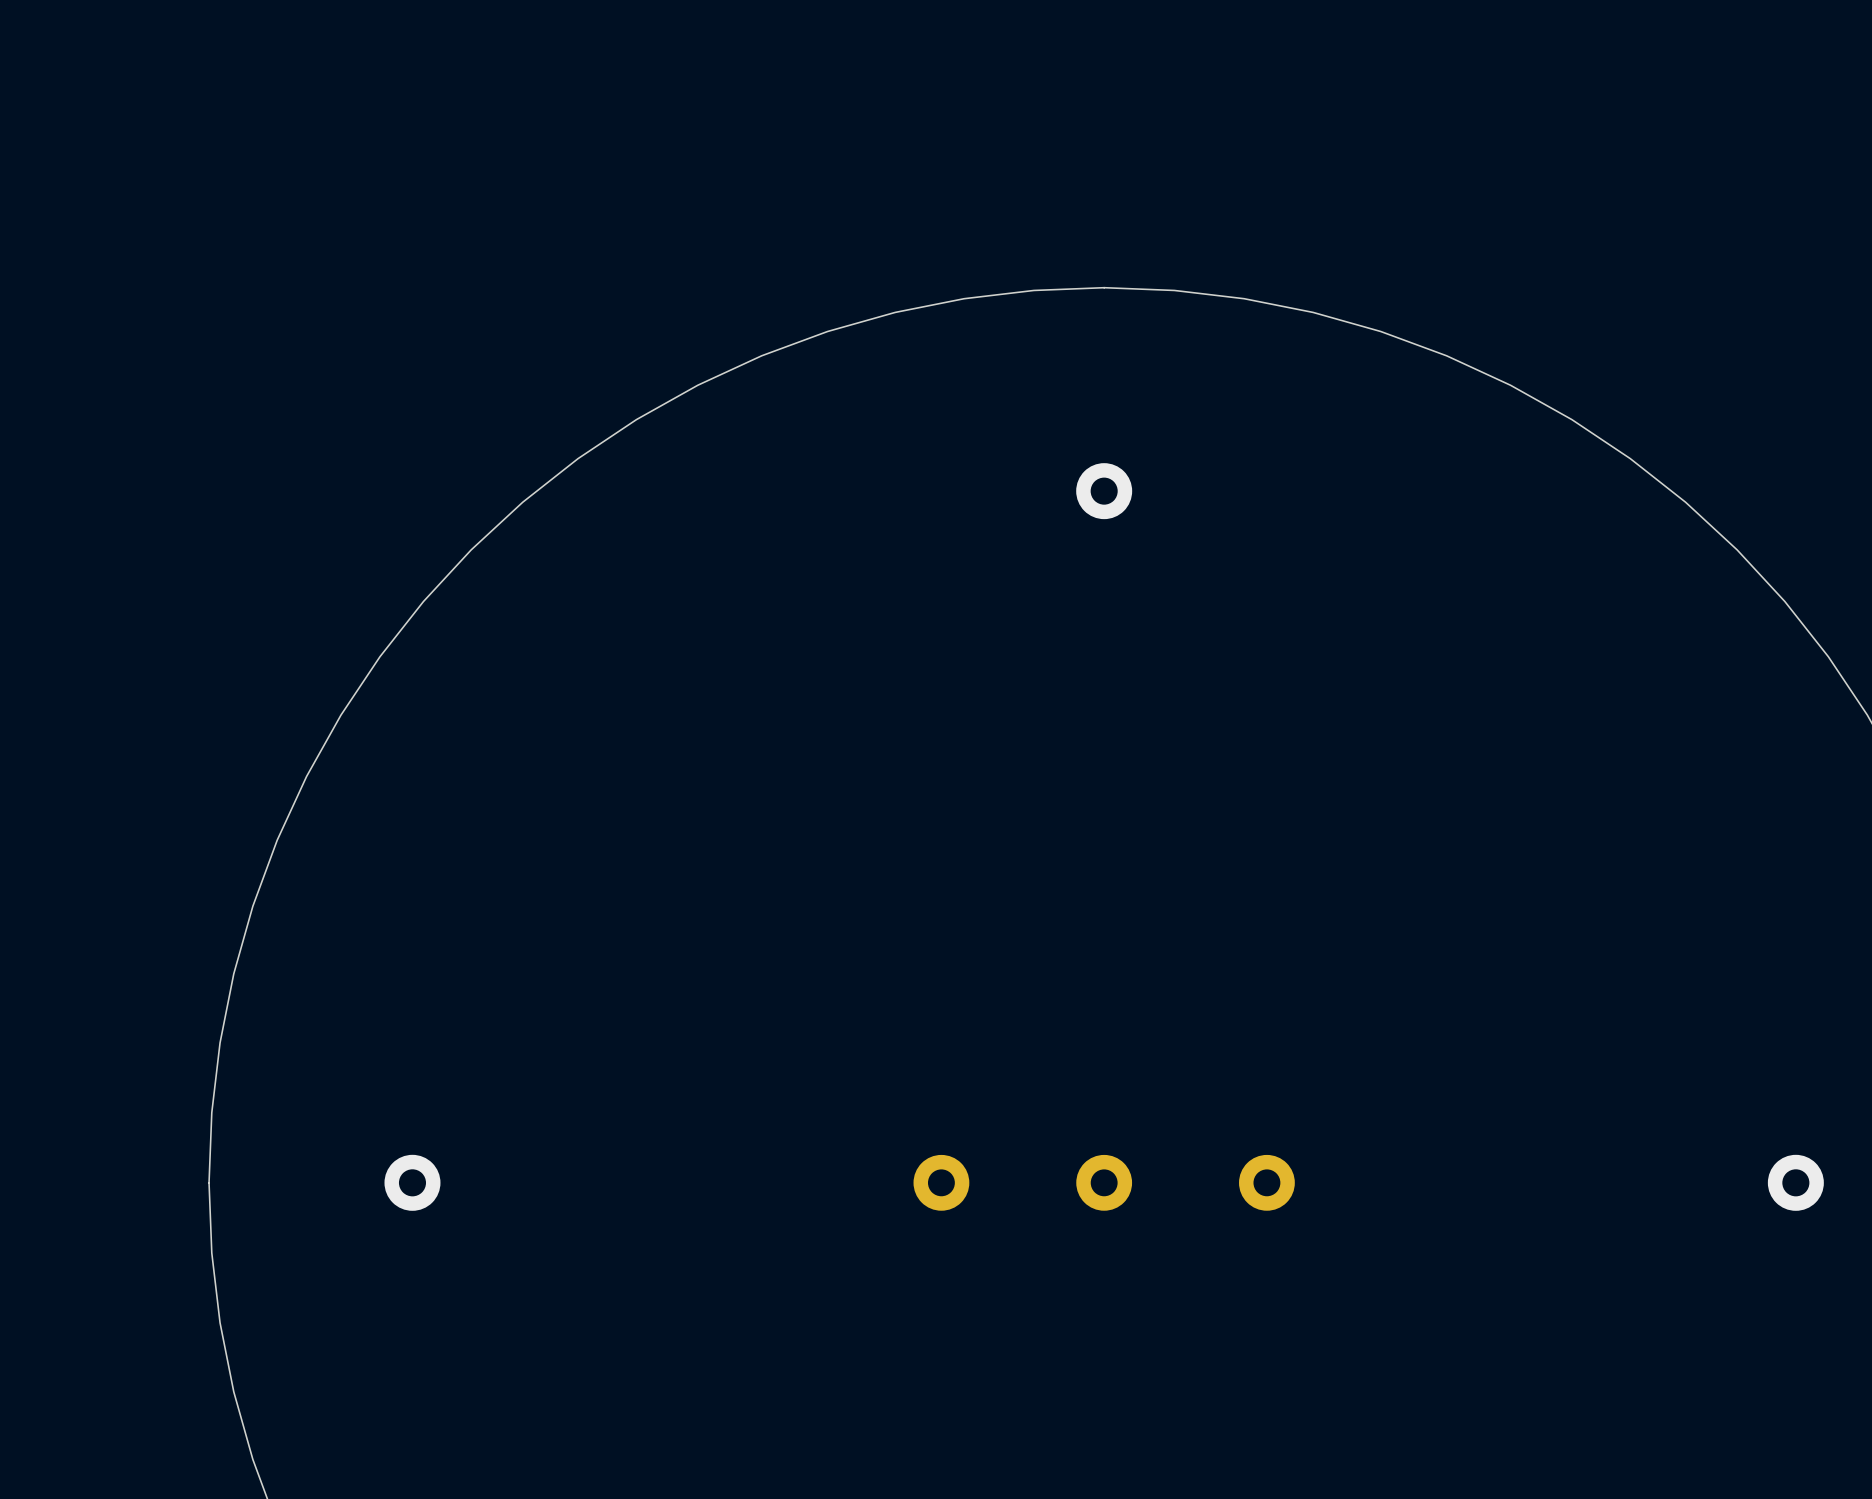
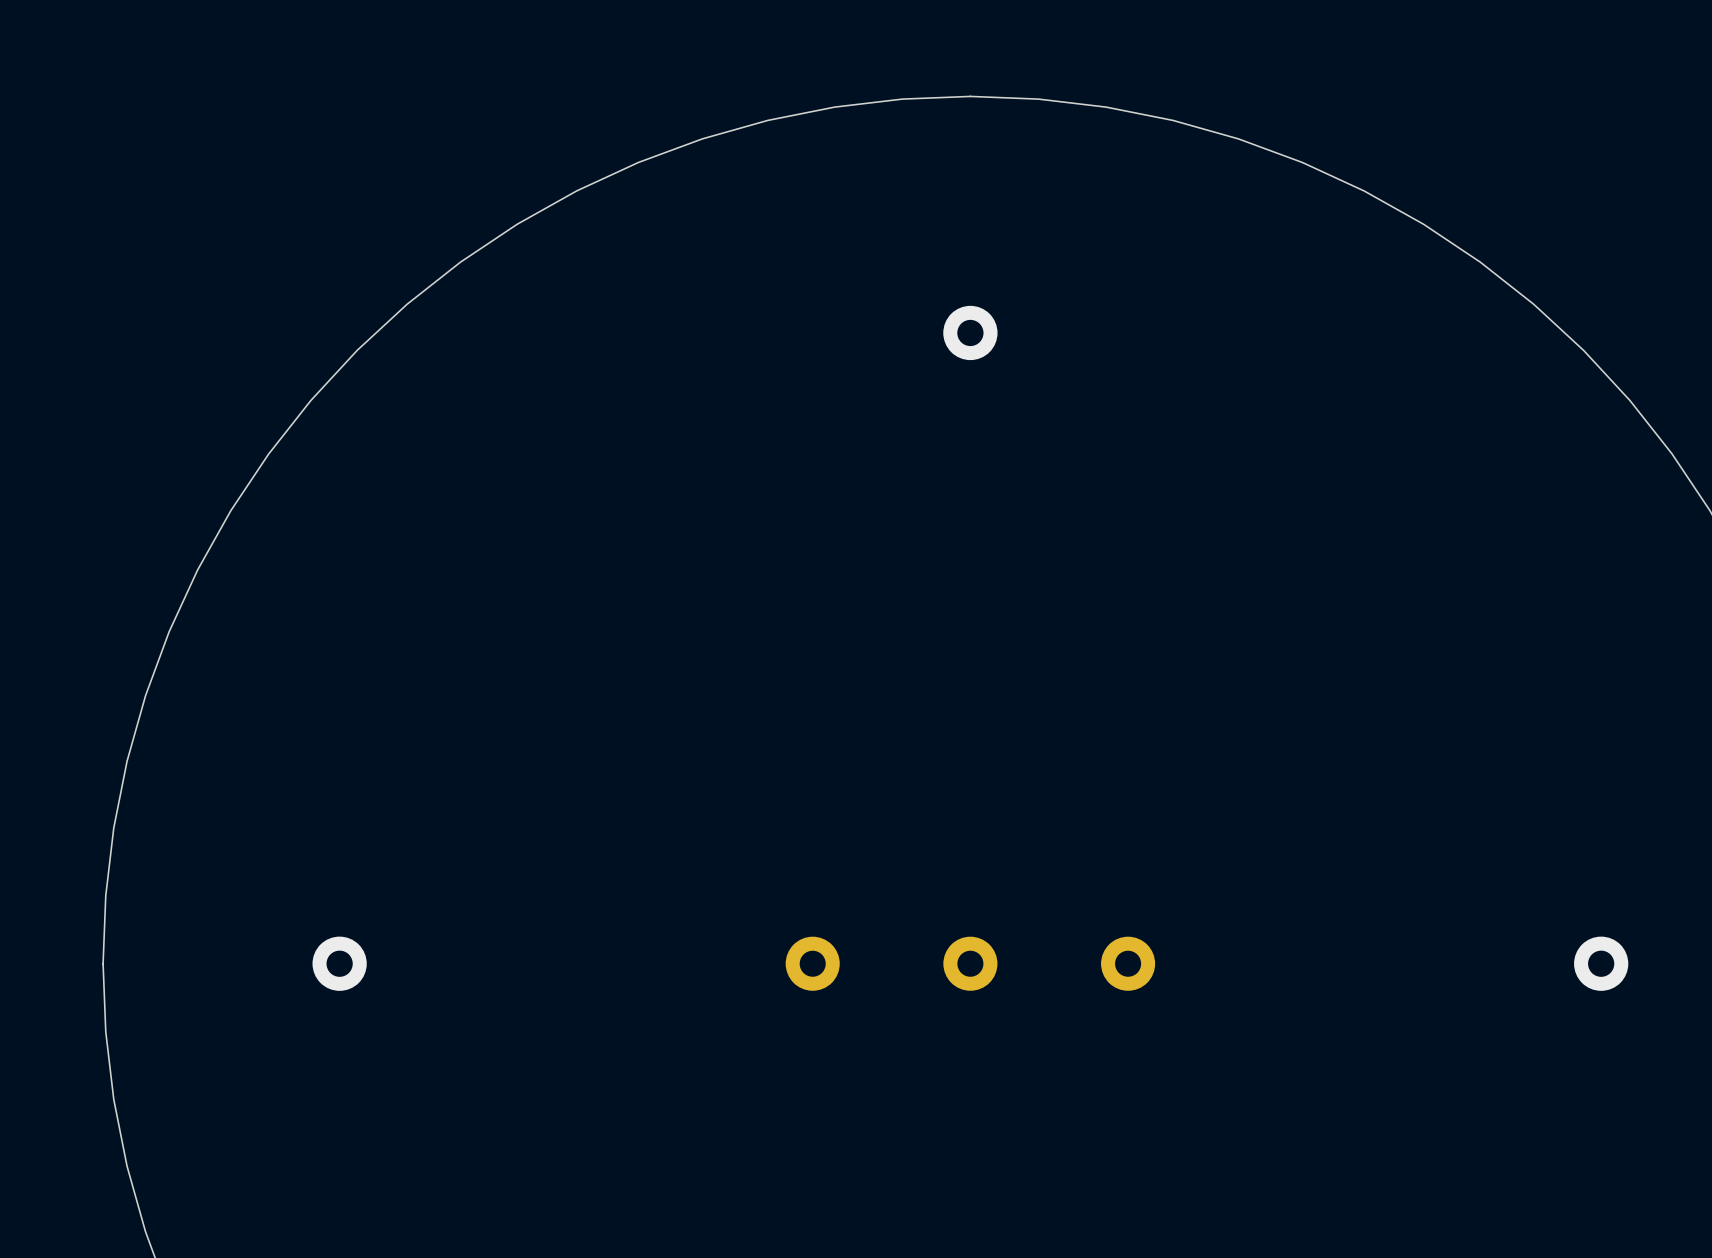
via position: (1104, 491) -> (970, 332)
via position: (412, 1182) -> (339, 963)
via position: (1795, 1182) -> (1601, 963)

